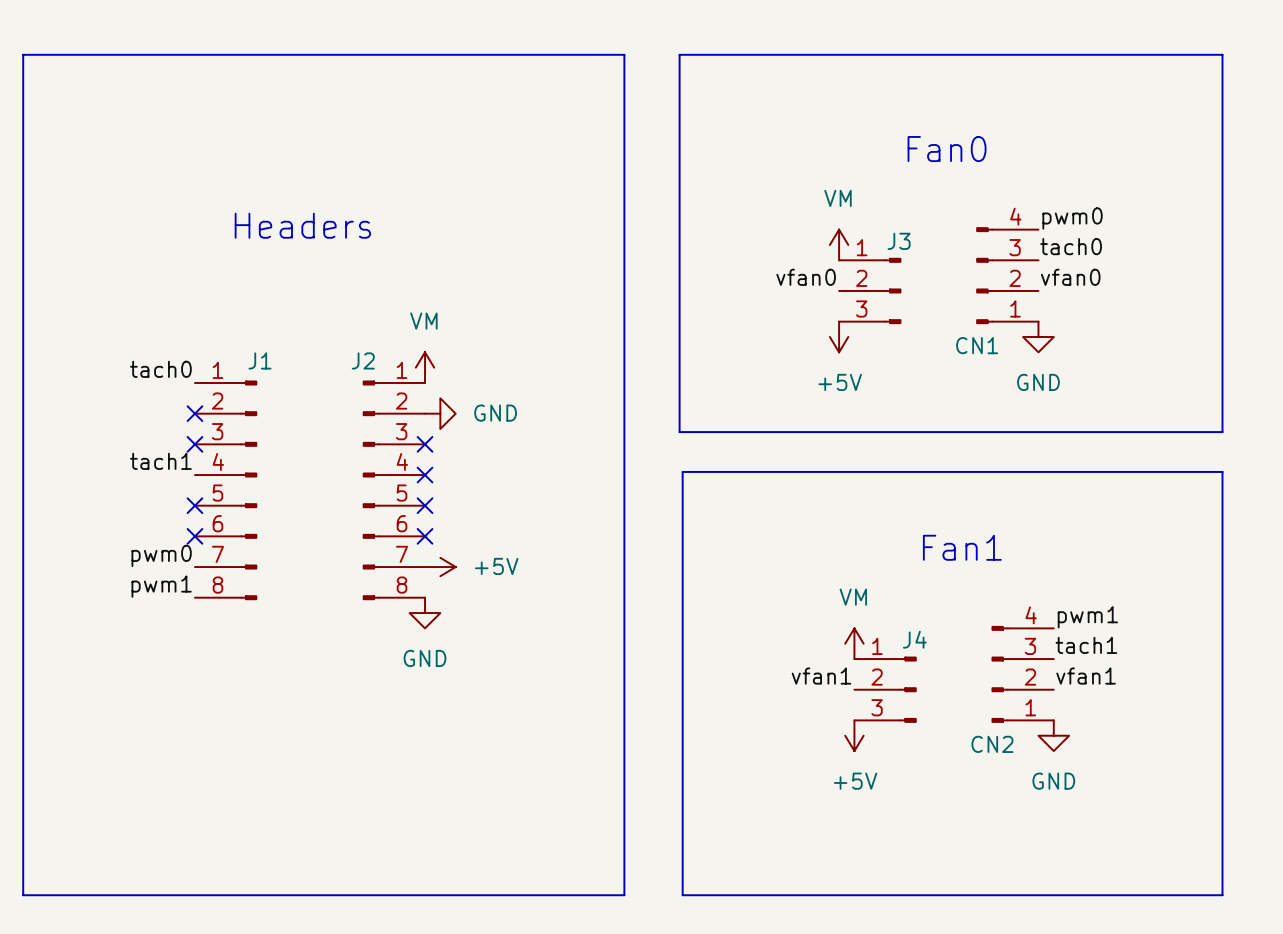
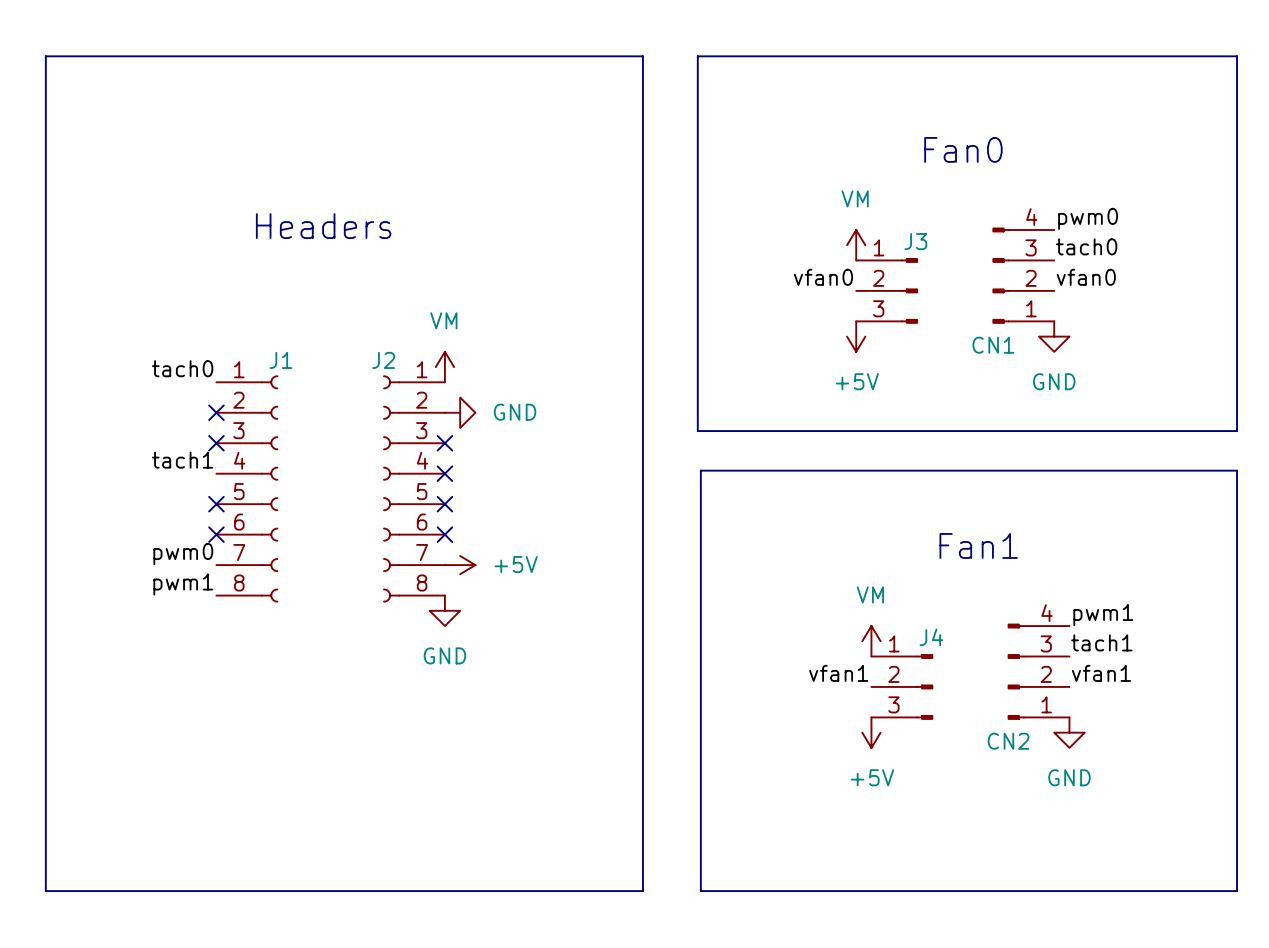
J1 symbol: [194, 380, 258, 601] -> [216, 375, 279, 603]
J2 symbol: [362, 380, 426, 601] -> [383, 375, 445, 603]

